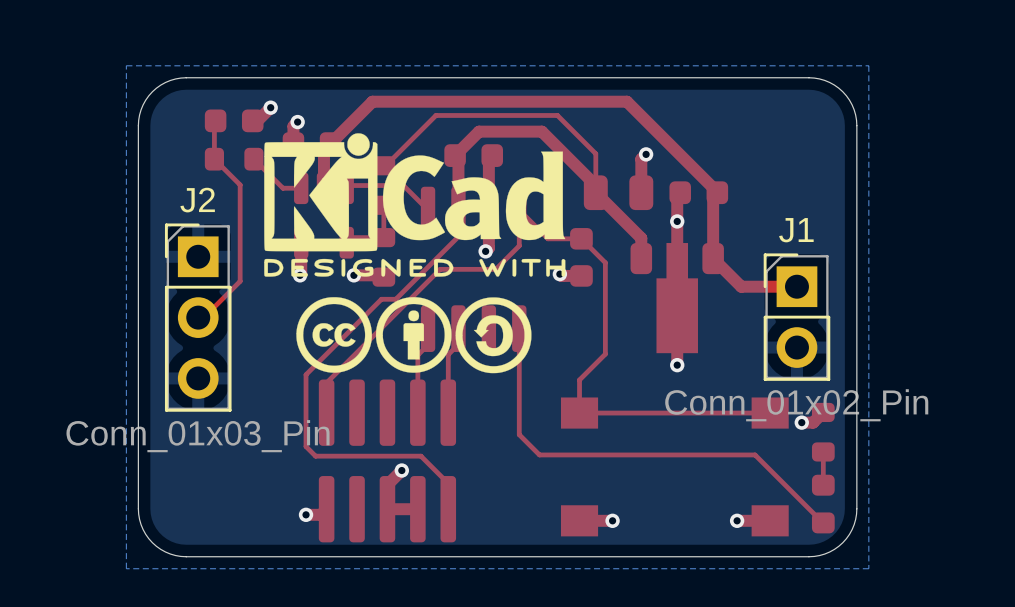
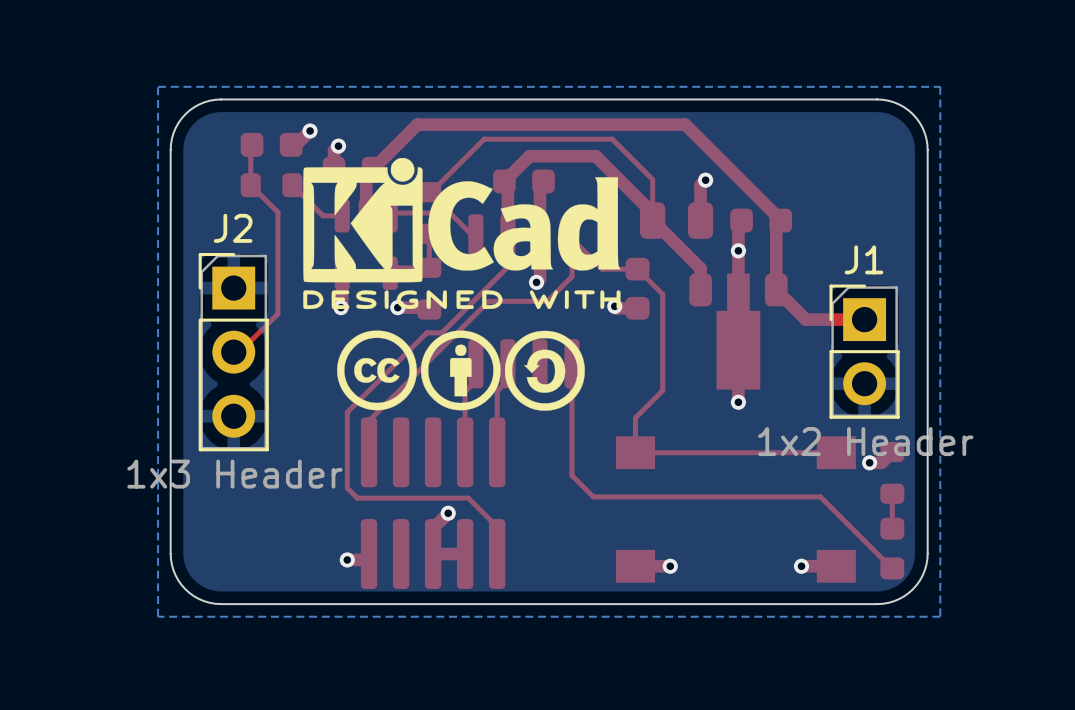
J1 value: Conn_01x02_Pin (796, 405) -> 1x2 Header (865, 441)
J2 value: Conn_01x03_Pin (198, 436) -> 1x3 Header (234, 474)

